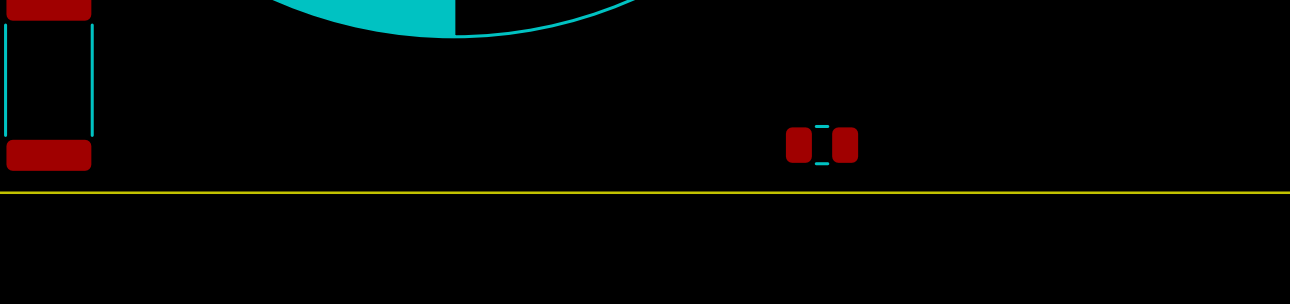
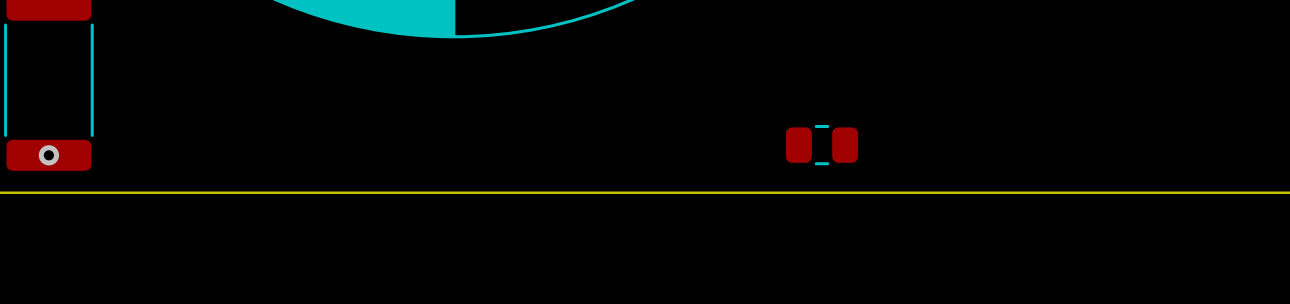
via: none -> (48, 155)

